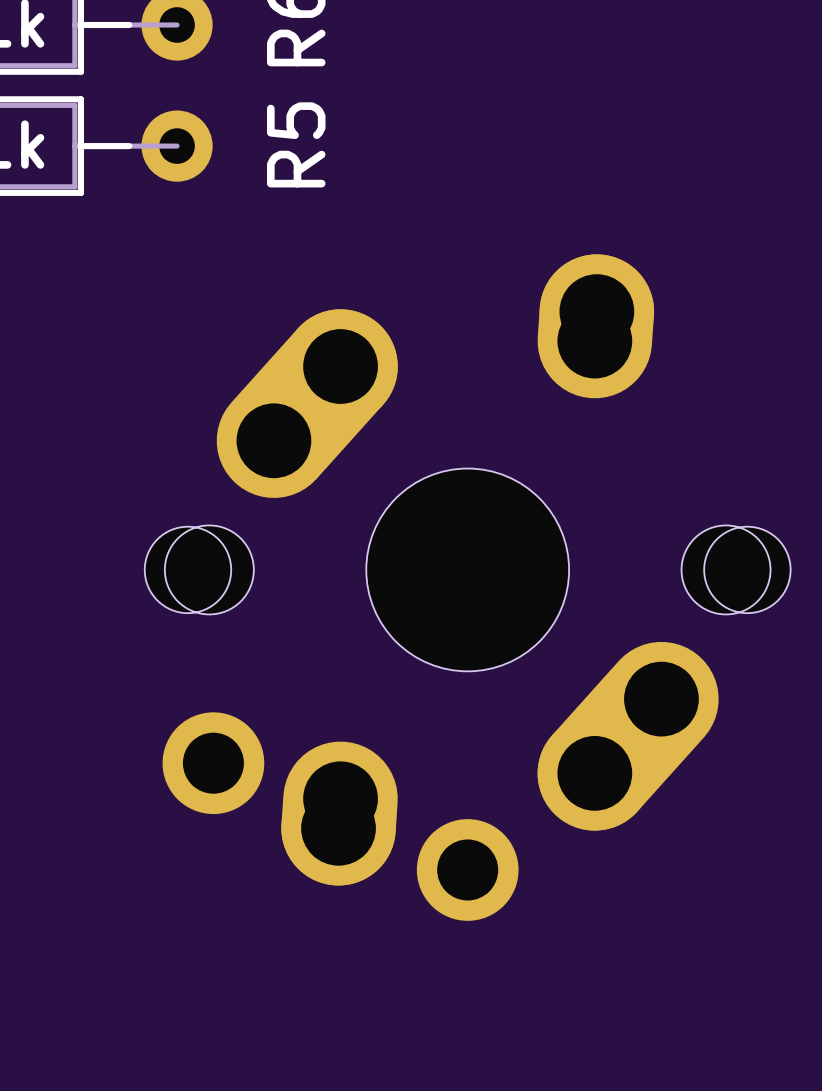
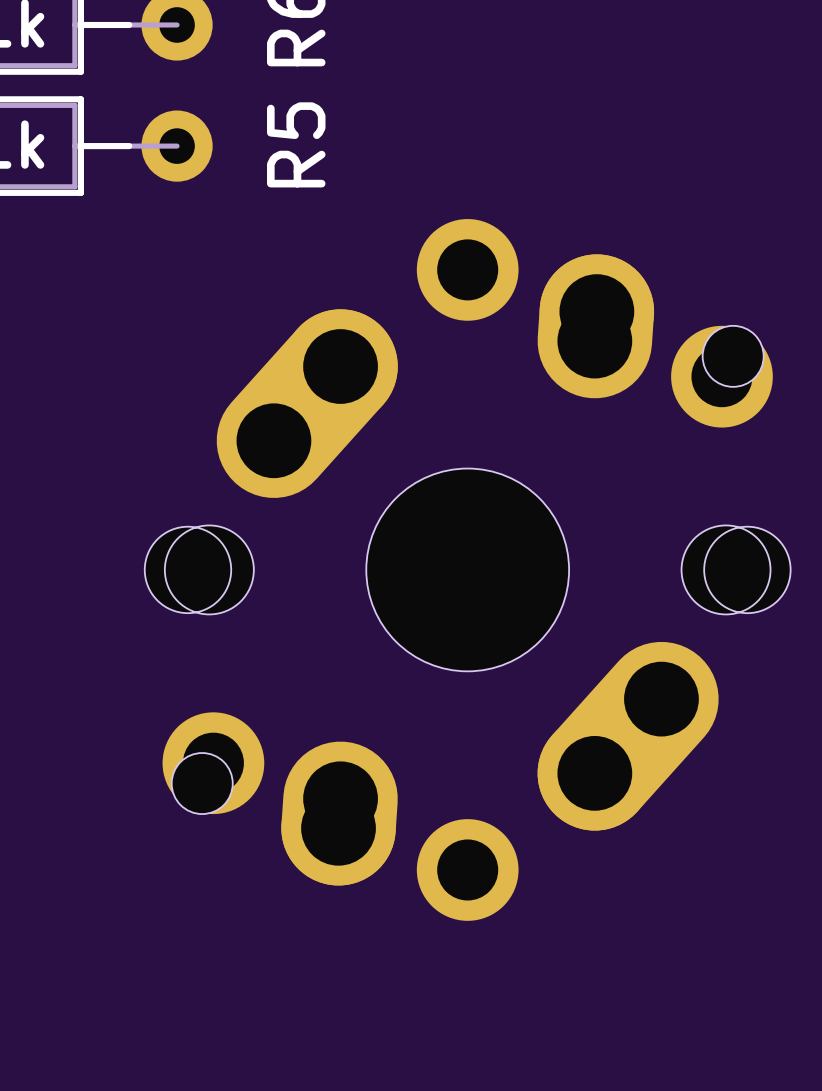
part footprint: [144, 254, 791, 921] -> [144, 219, 791, 921]

